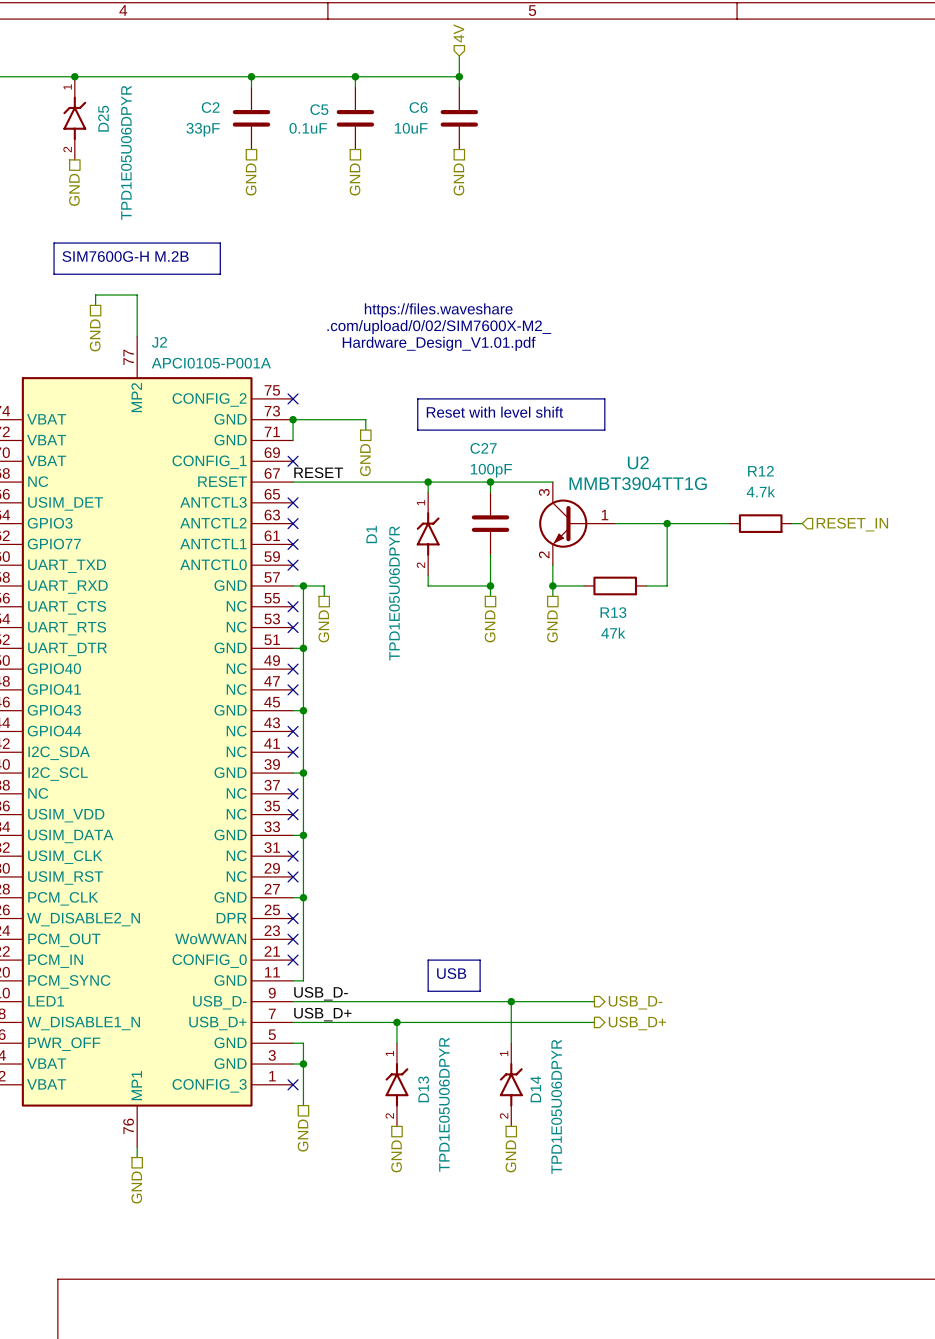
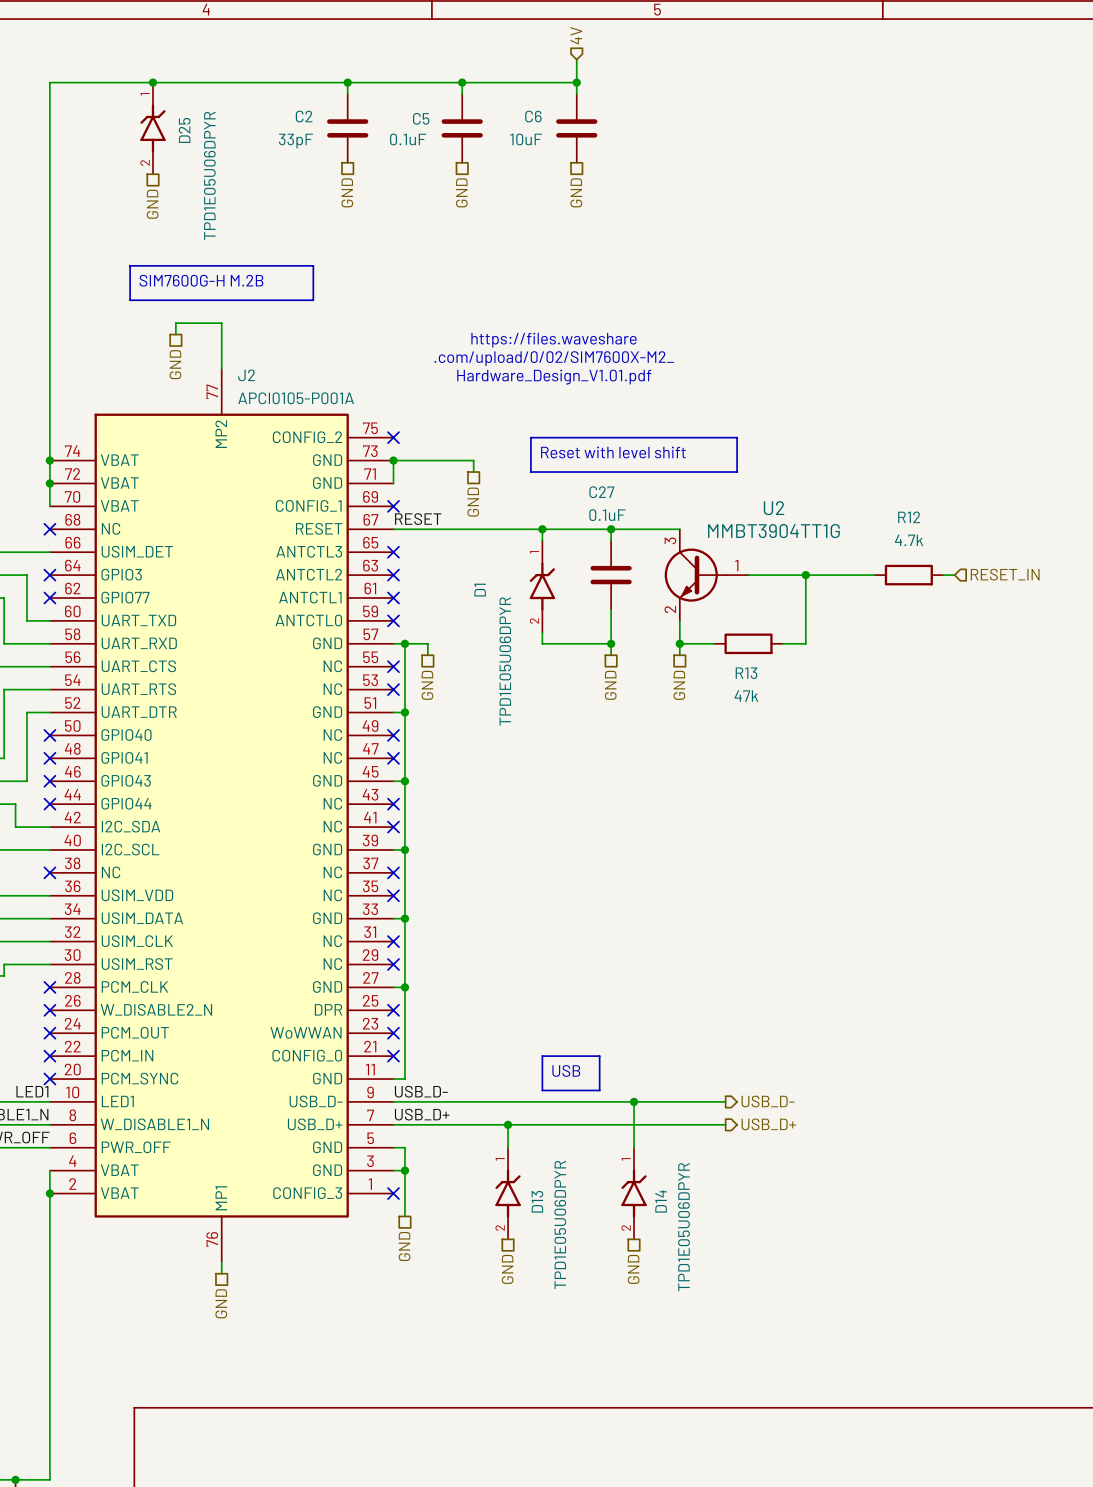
C27 value: 100pF (491, 470) -> 0.1uF (607, 515)

